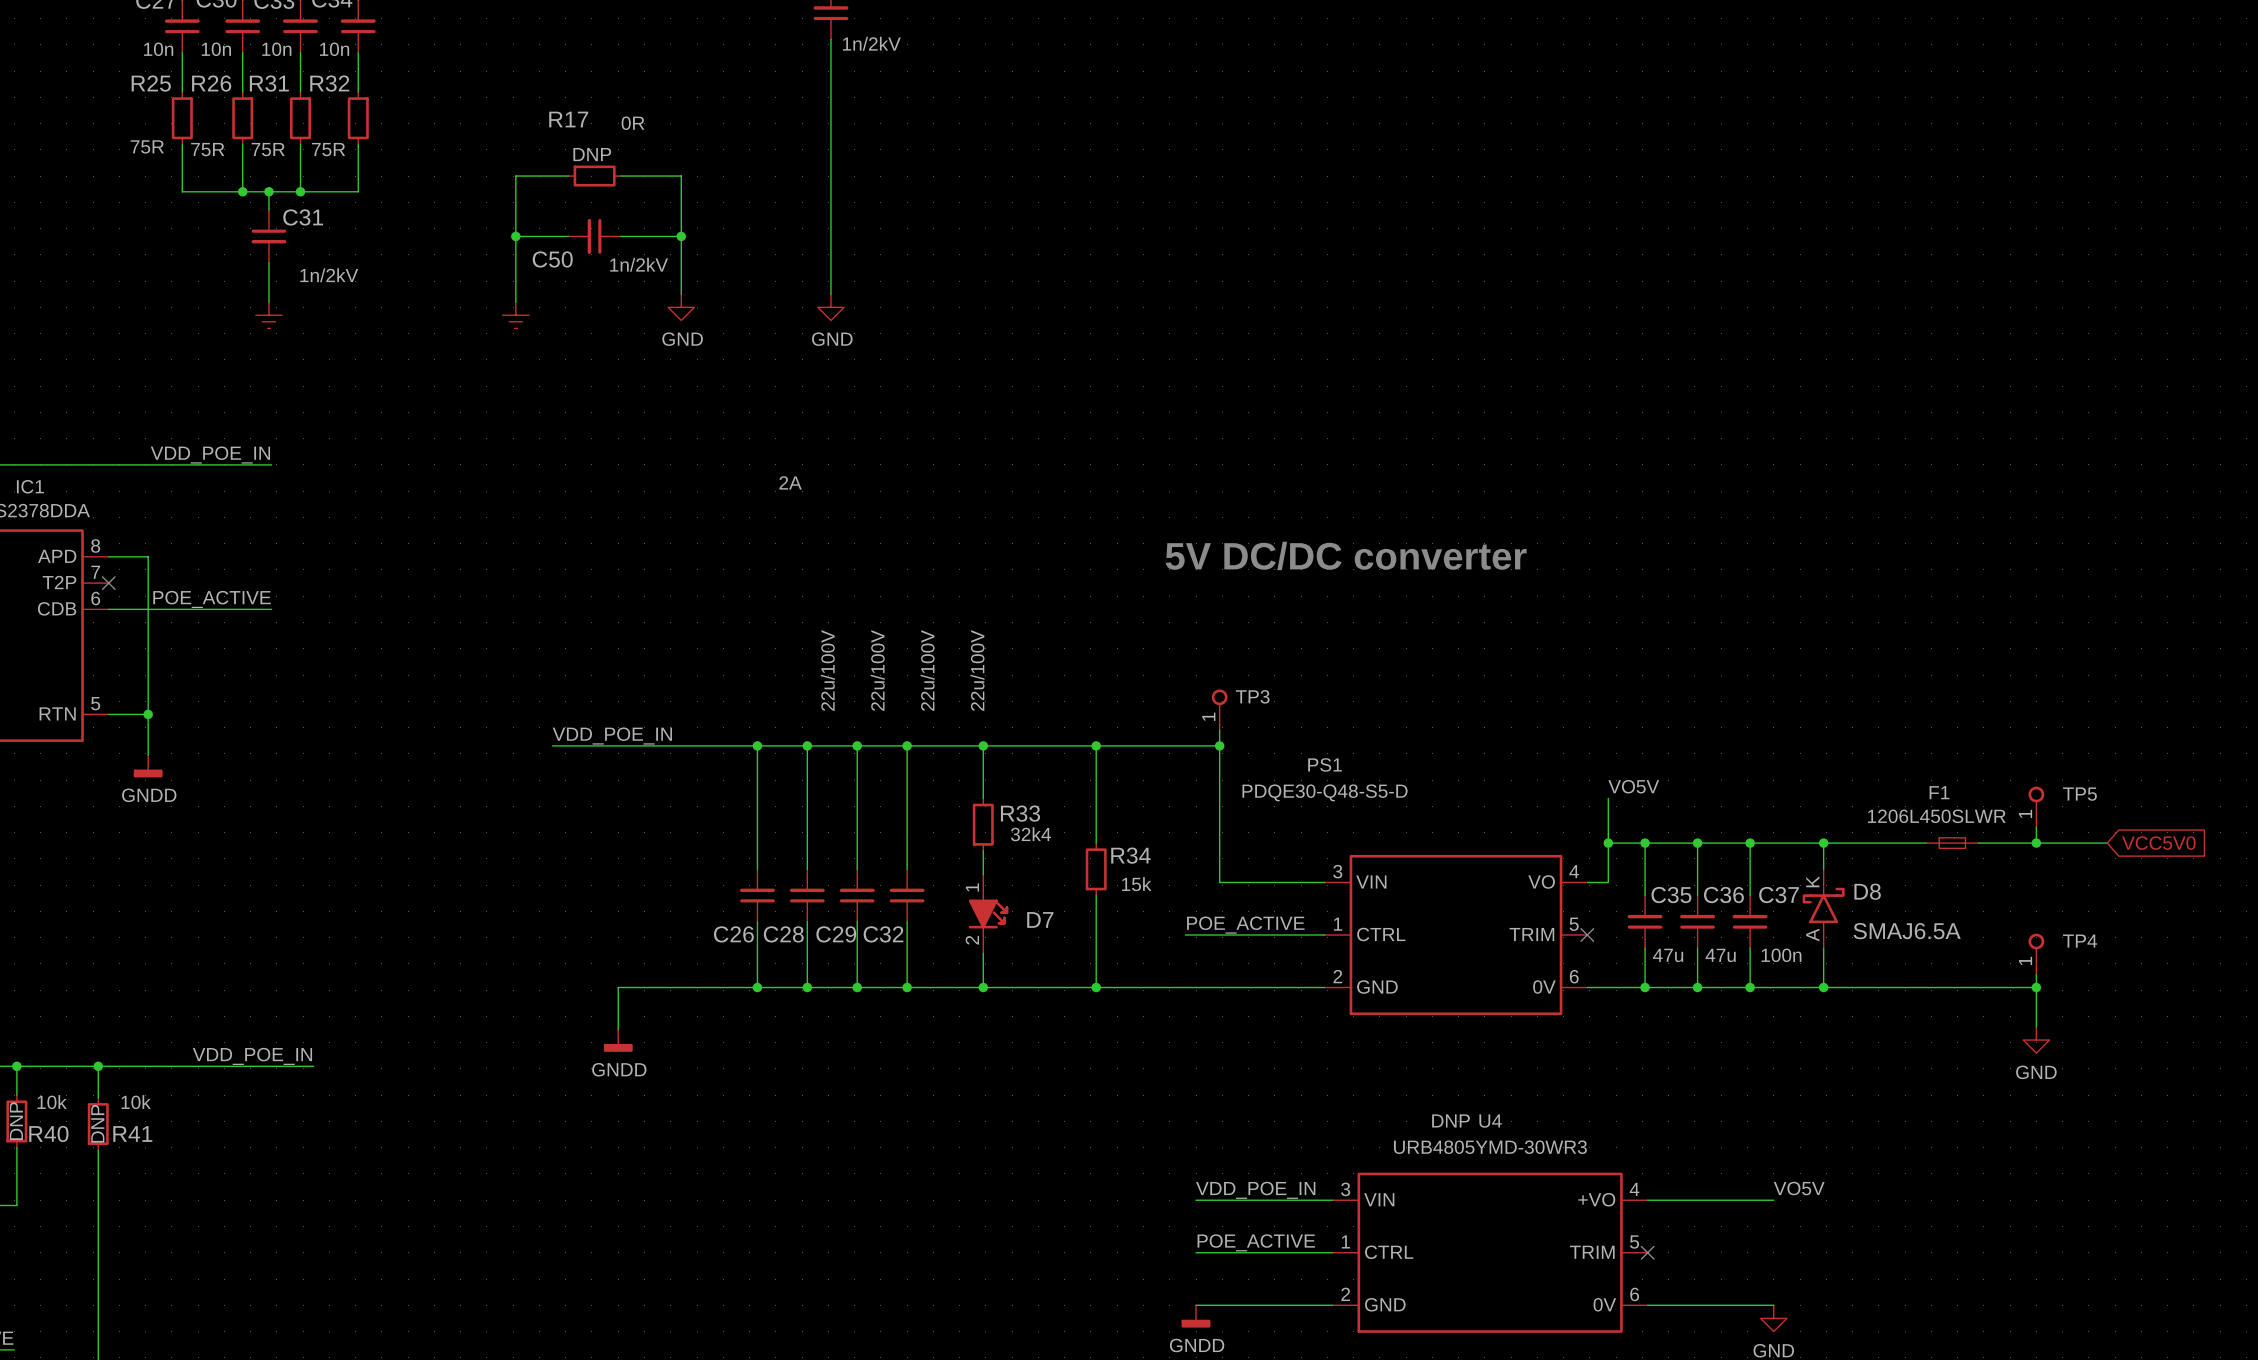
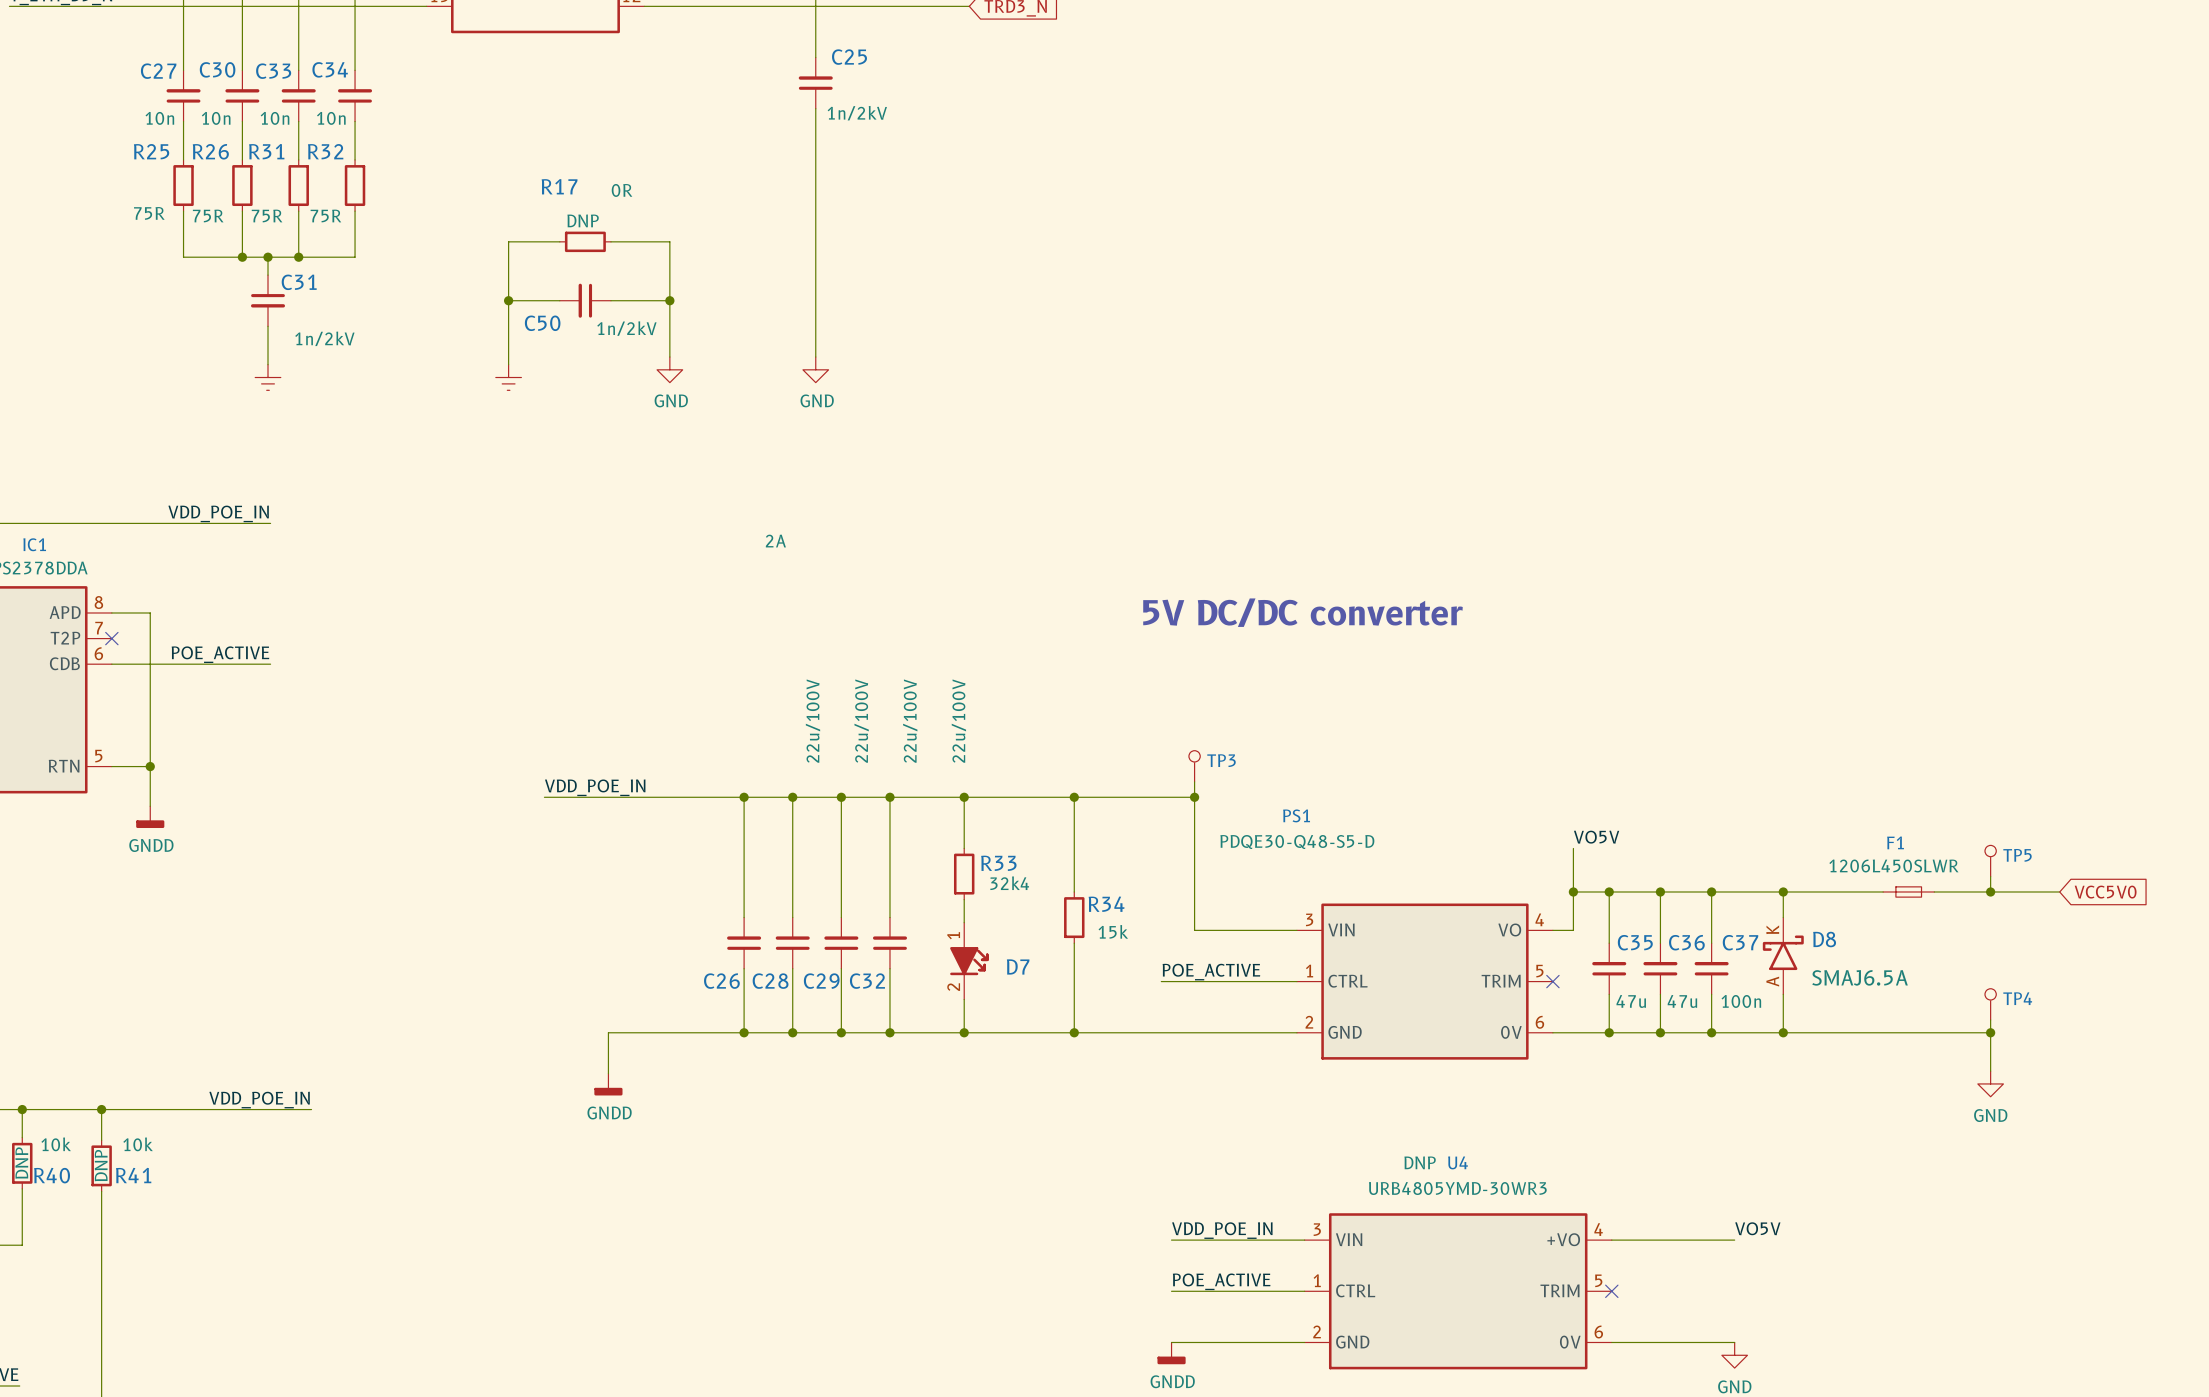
TP3 symbol: [1211, 689, 1228, 731] -> [1188, 750, 1201, 782]
TP5 symbol: [2028, 786, 2045, 828] -> [1984, 845, 1997, 877]
TP4 symbol: [2028, 933, 2045, 975] -> [1984, 988, 1997, 1020]

